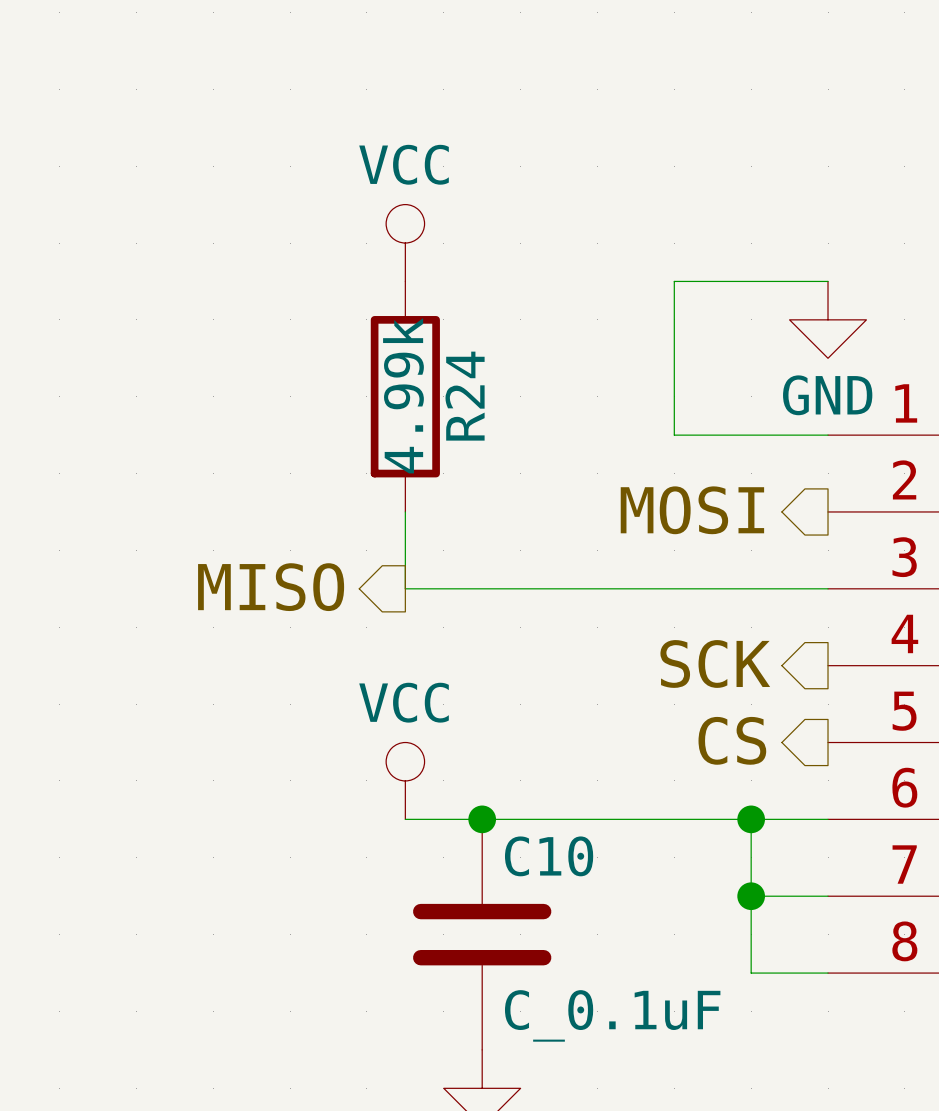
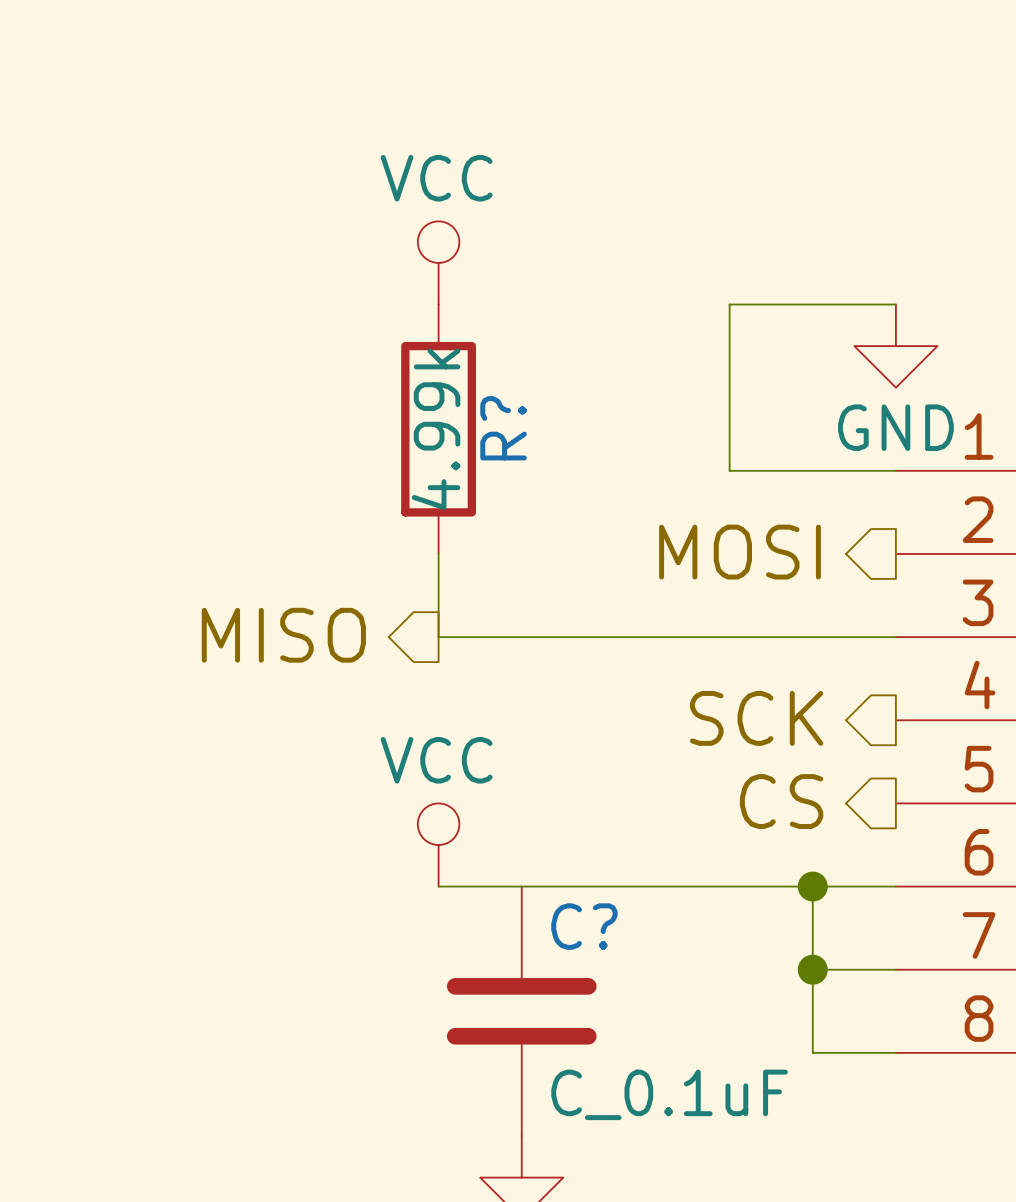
R24 name: R24 (465, 396) -> R? (503, 428)
junction: (482, 819) -> none
C10 name: C10 (549, 856) -> C? (584, 926)

